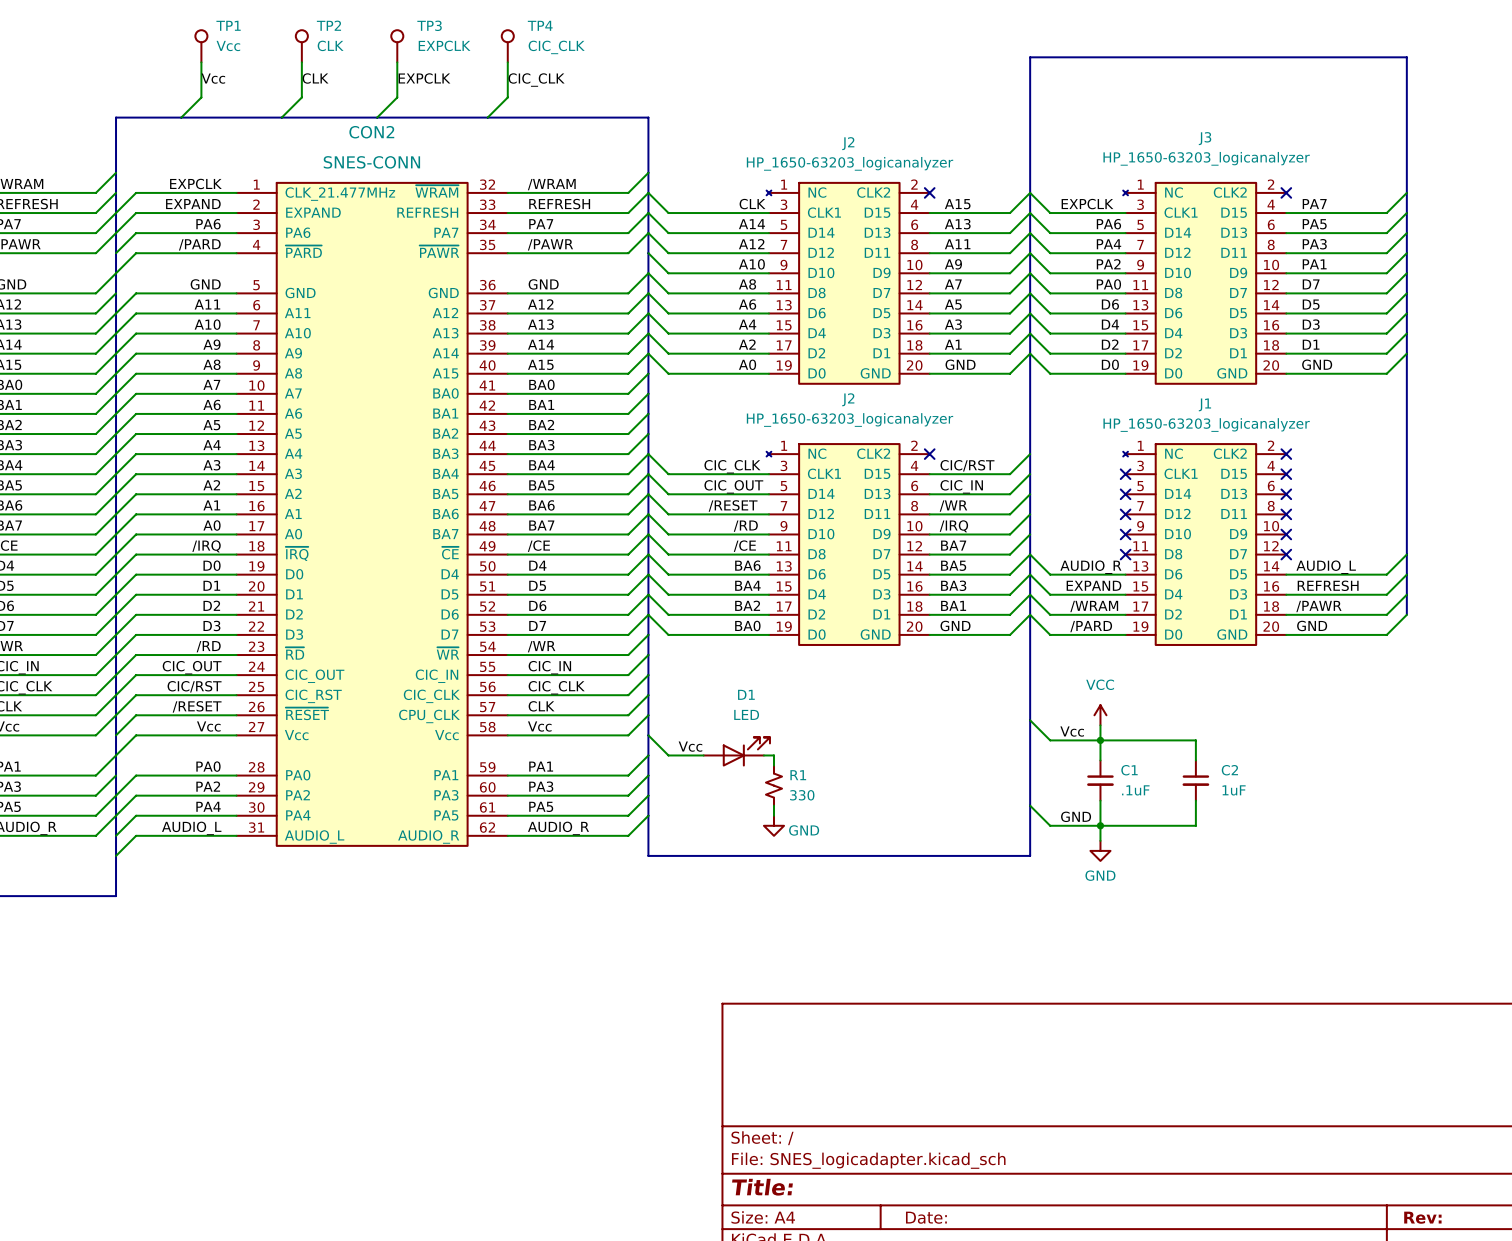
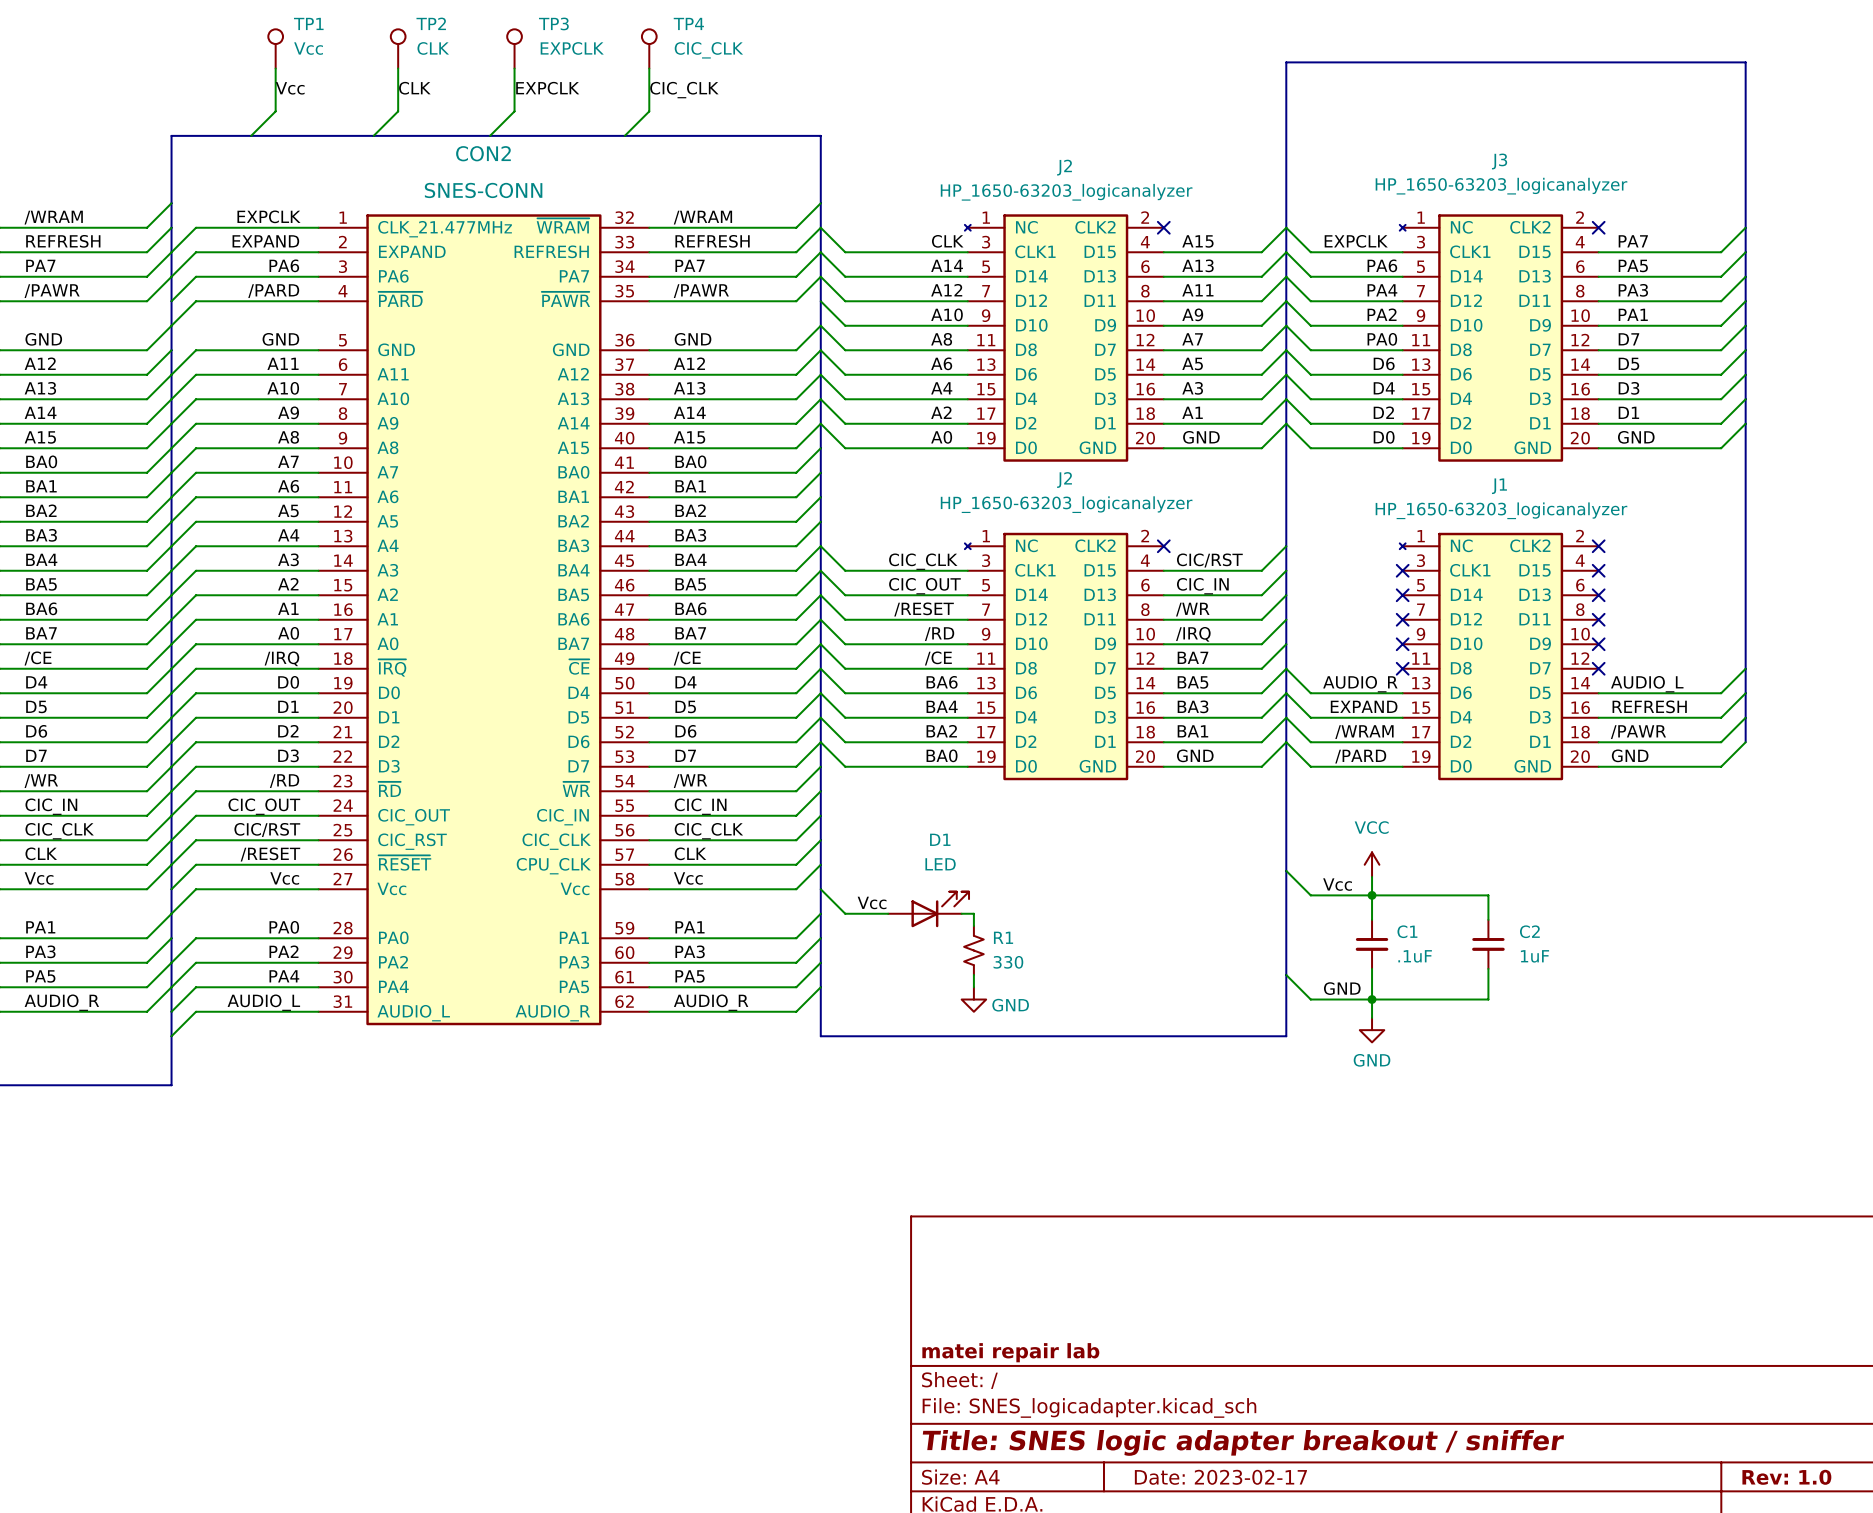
title block: none -> matei repair lab (1010, 1352)
title block: Title: (762, 1187) -> Title: SNES logic adapter breakout / sniffer (1243, 1442)
title block: Date: (926, 1217) -> Date: 2023-02-17 (1220, 1477)
title block: Rev: (1422, 1217) -> Rev: 1.0 (1786, 1477)

